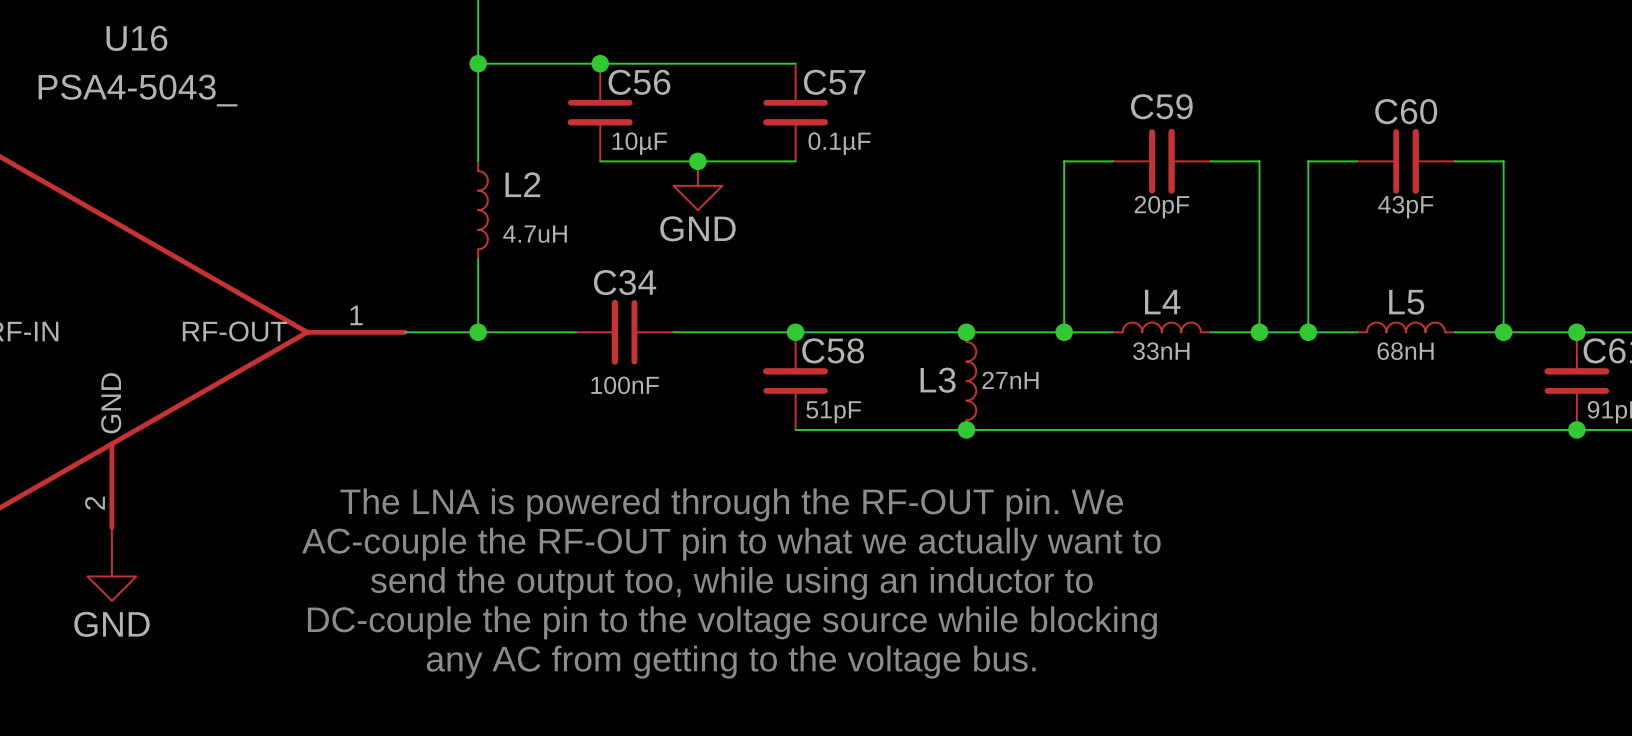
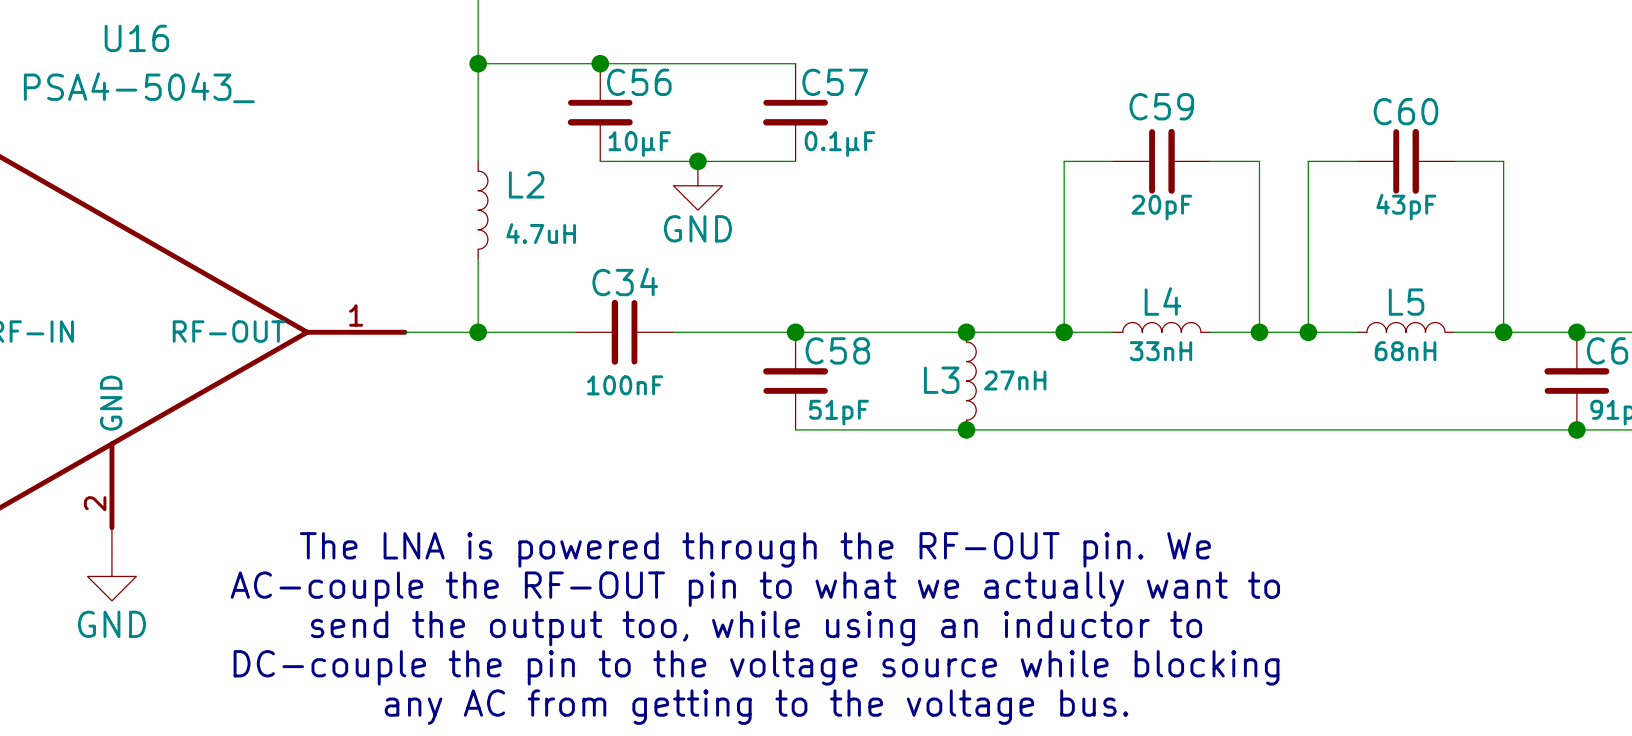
text position: The LNA is powered through the RF-OUT pin. We (731, 504) -> The LNA is powered through the RF-OUT pin. We (755, 549)
text position: AC-couple the RF-OUT pin to what we actually want to (731, 544) -> AC-couple the RF-OUT pin to what we actually want to (755, 589)
text position: send the output too, while using an inductor to (731, 583) -> send the output too, while using an inductor to (756, 628)
text position: DC-couple the pin to the voltage source while blocking (732, 622) -> DC-couple the pin to the voltage source while blocking (756, 667)
text position: any AC from getting to the voltage bus. (731, 662) -> any AC from getting to the voltage bus. (756, 707)

